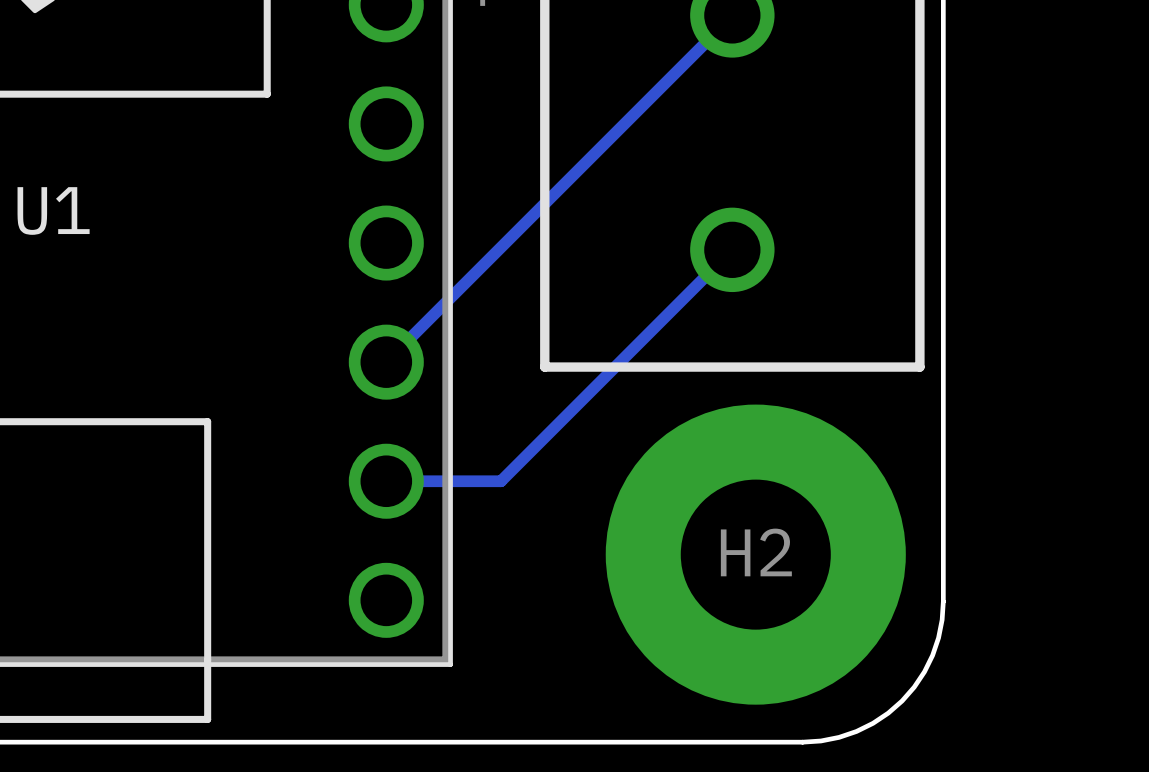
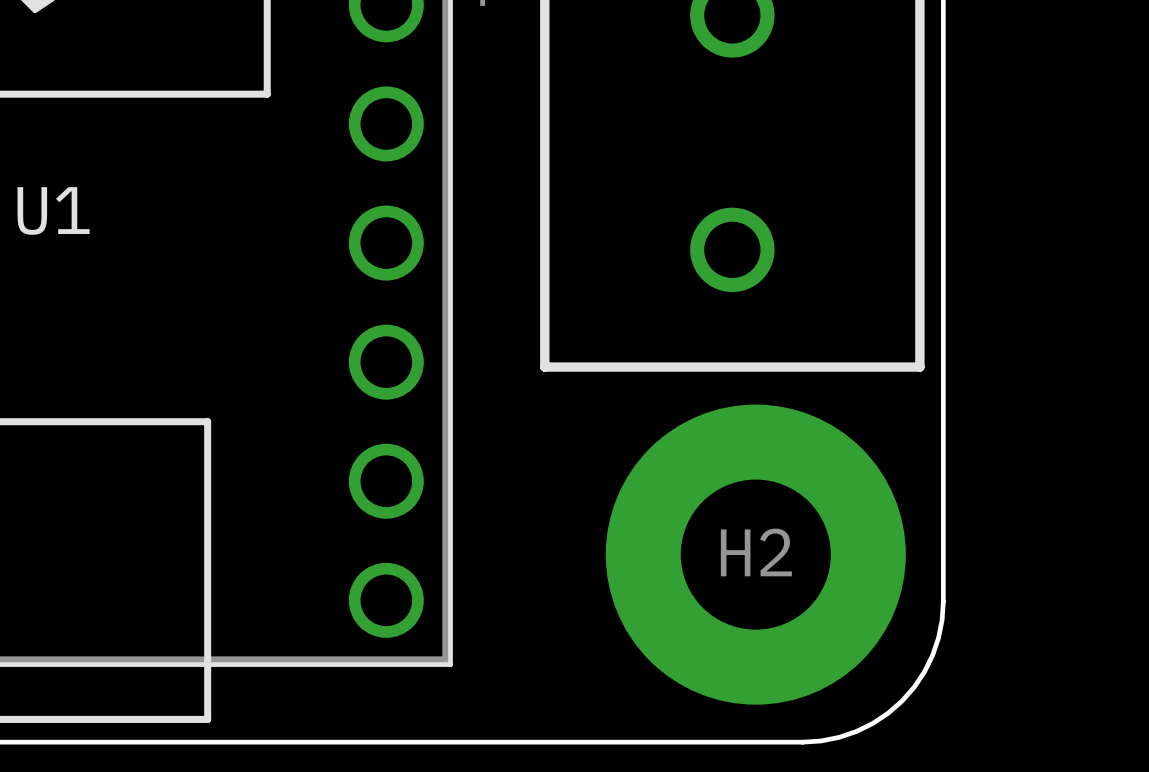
bottom track: (732, 16) (386, 362) -> none
bottom track: (732, 249) (500, 481) (386, 481) -> none

